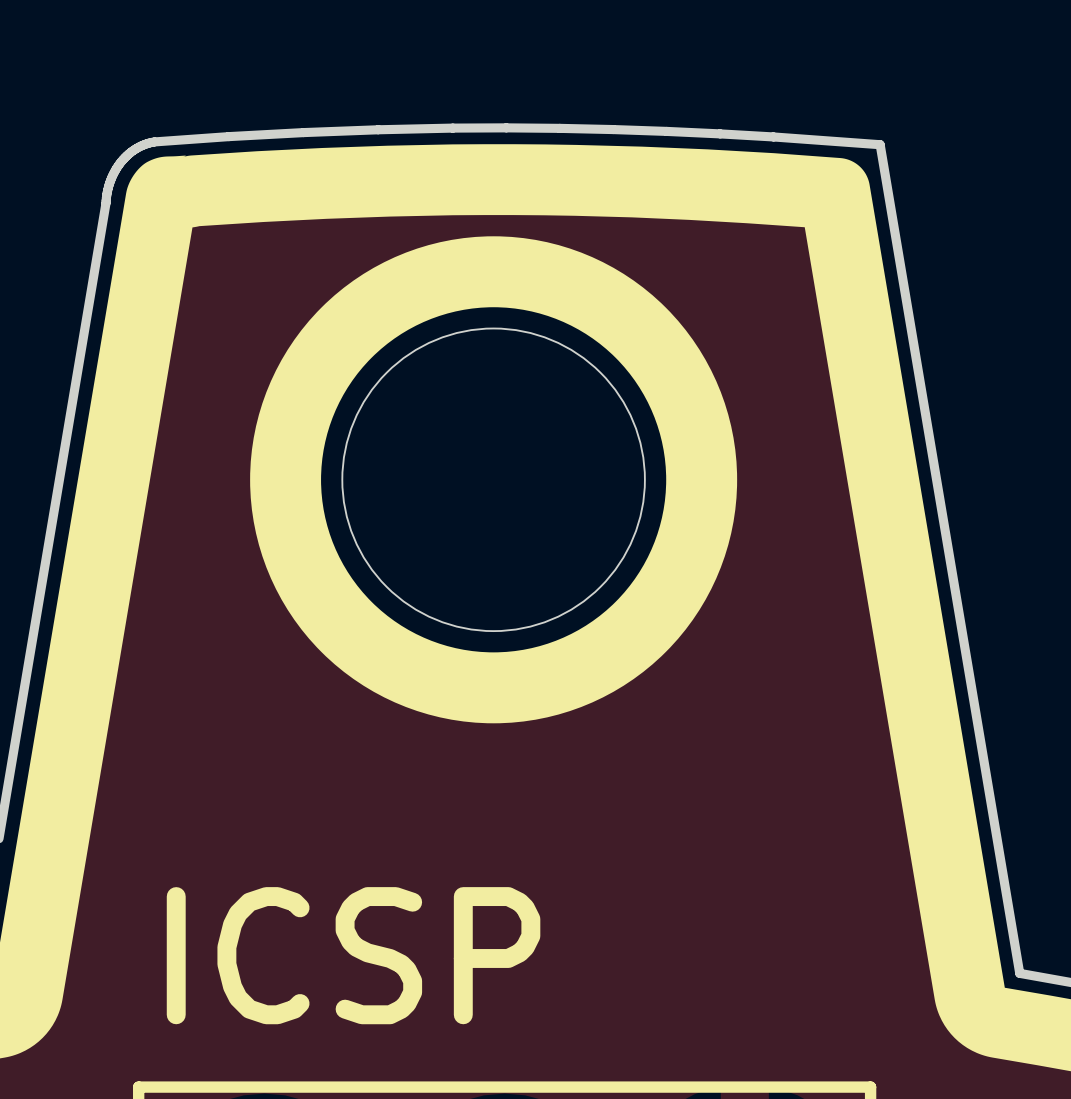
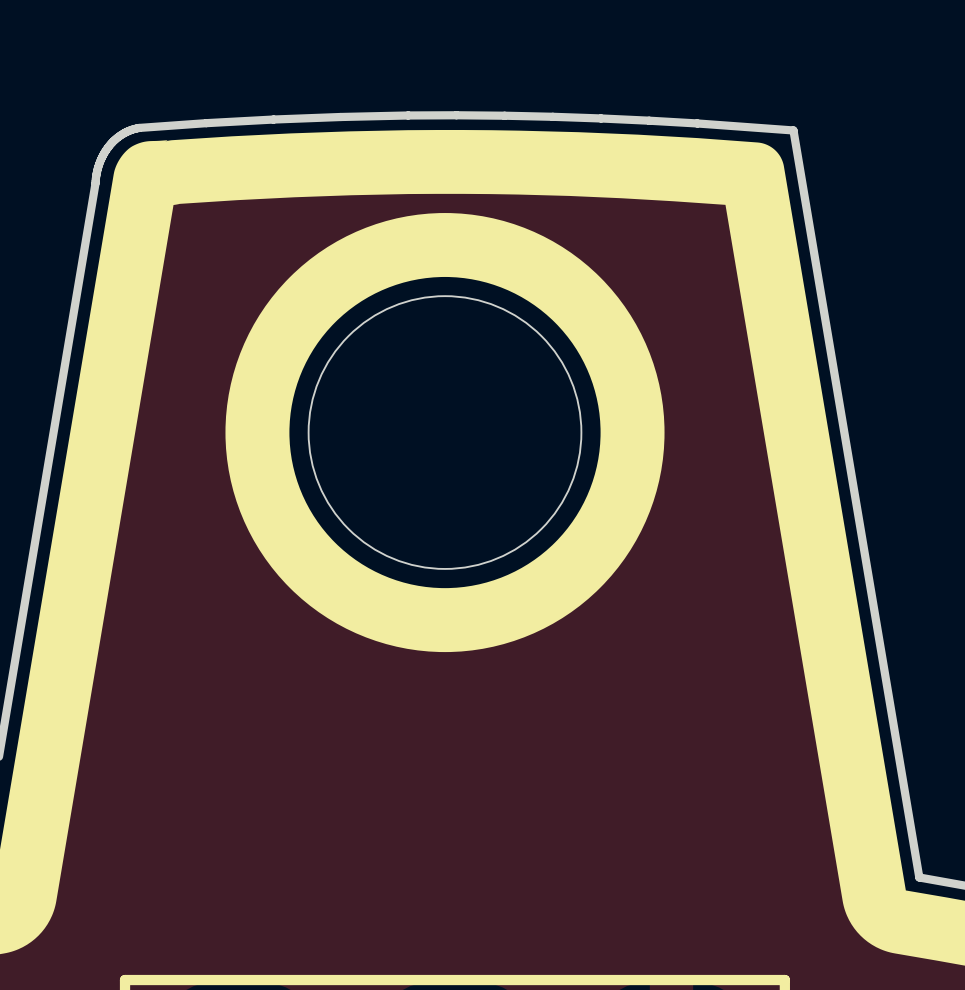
part value: ICSP (353, 955) -> none

